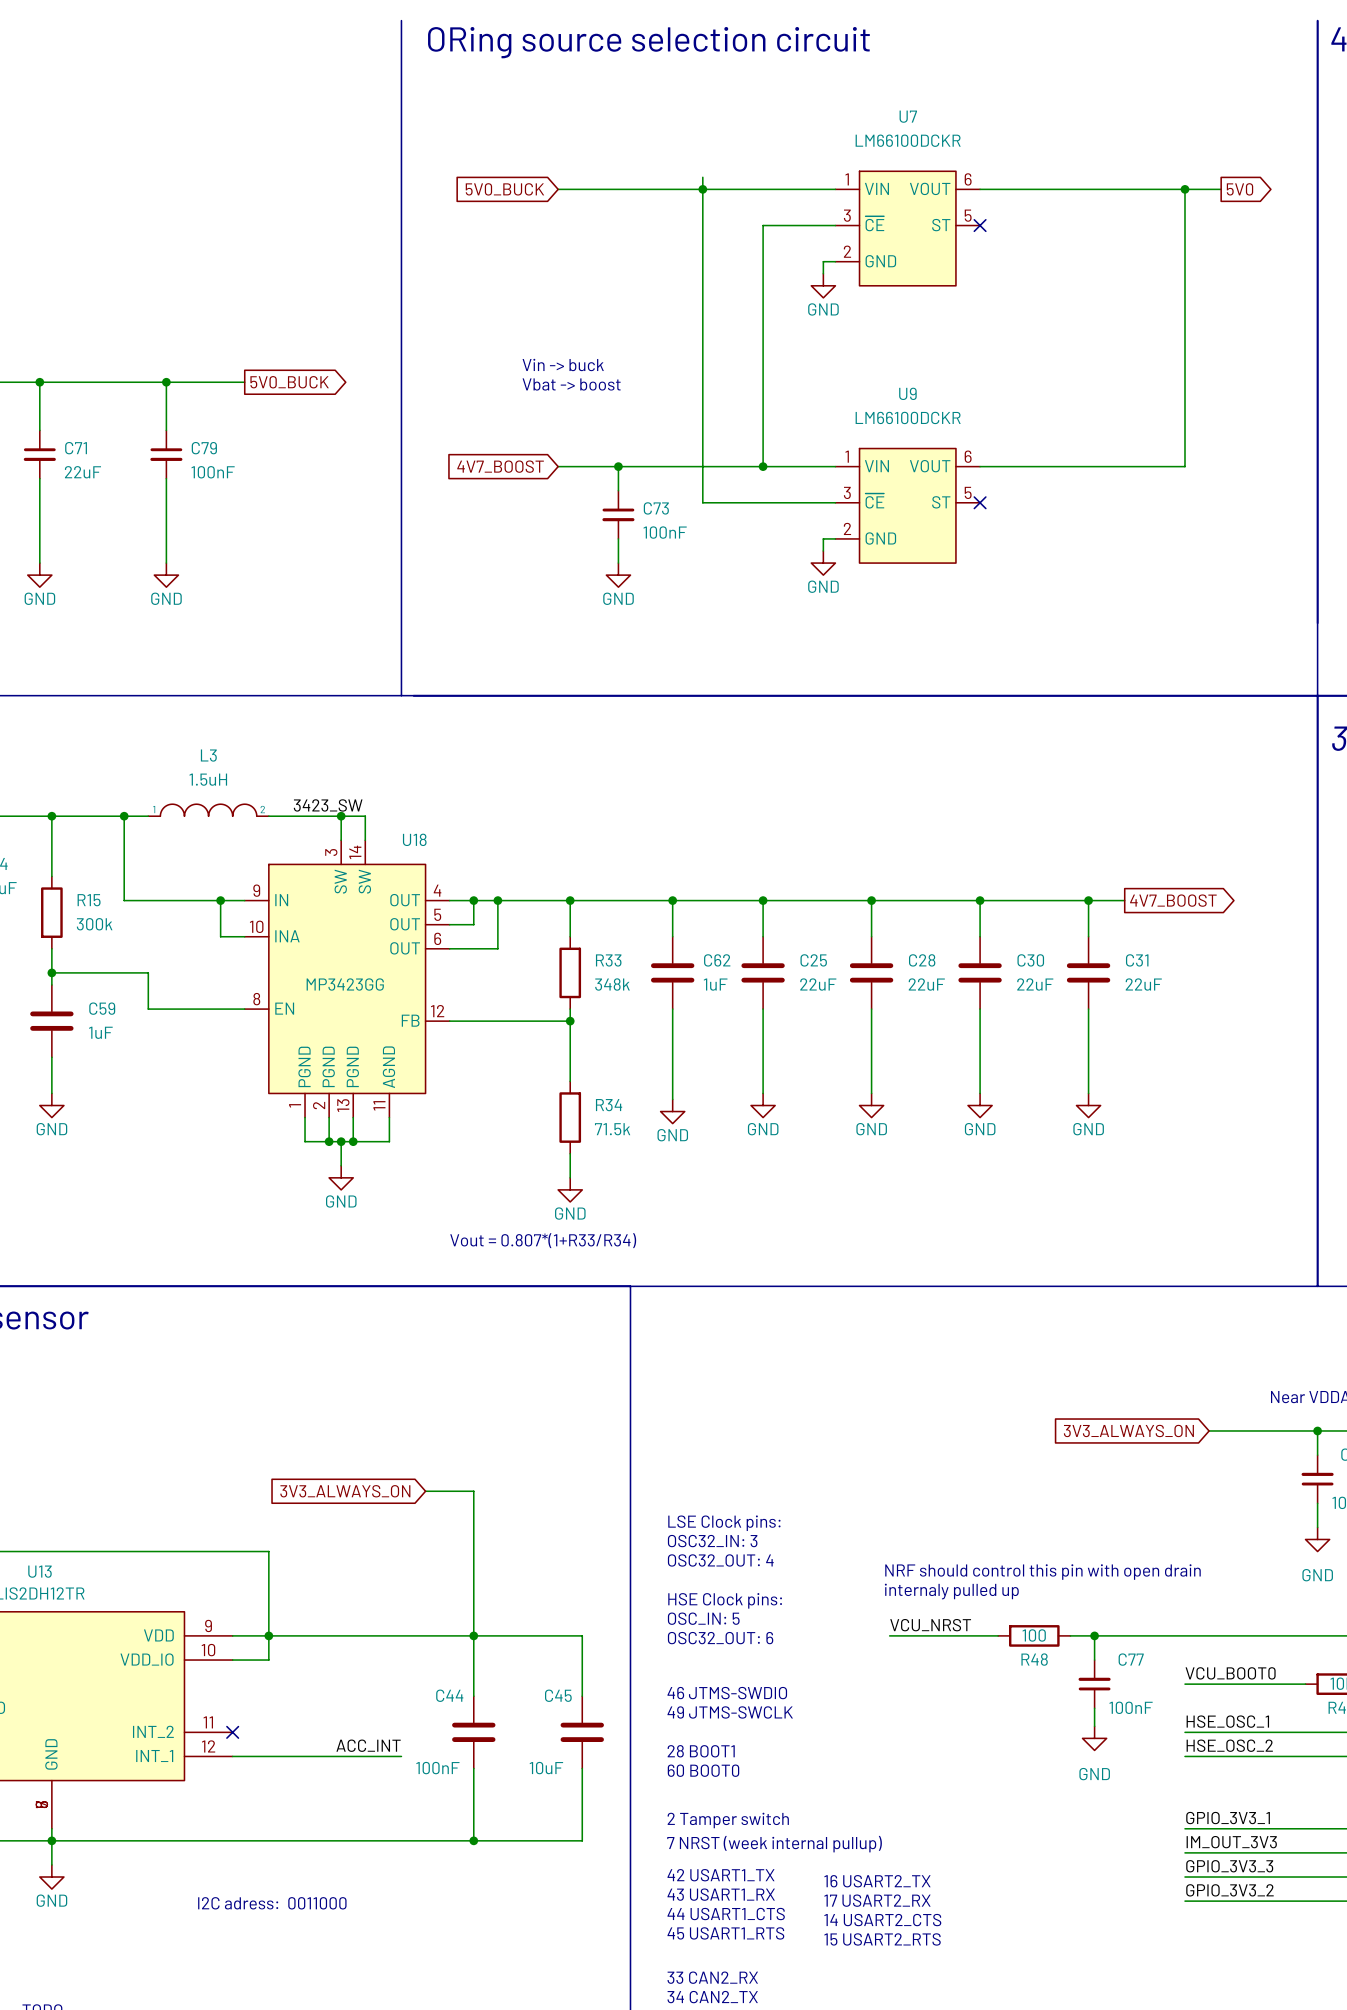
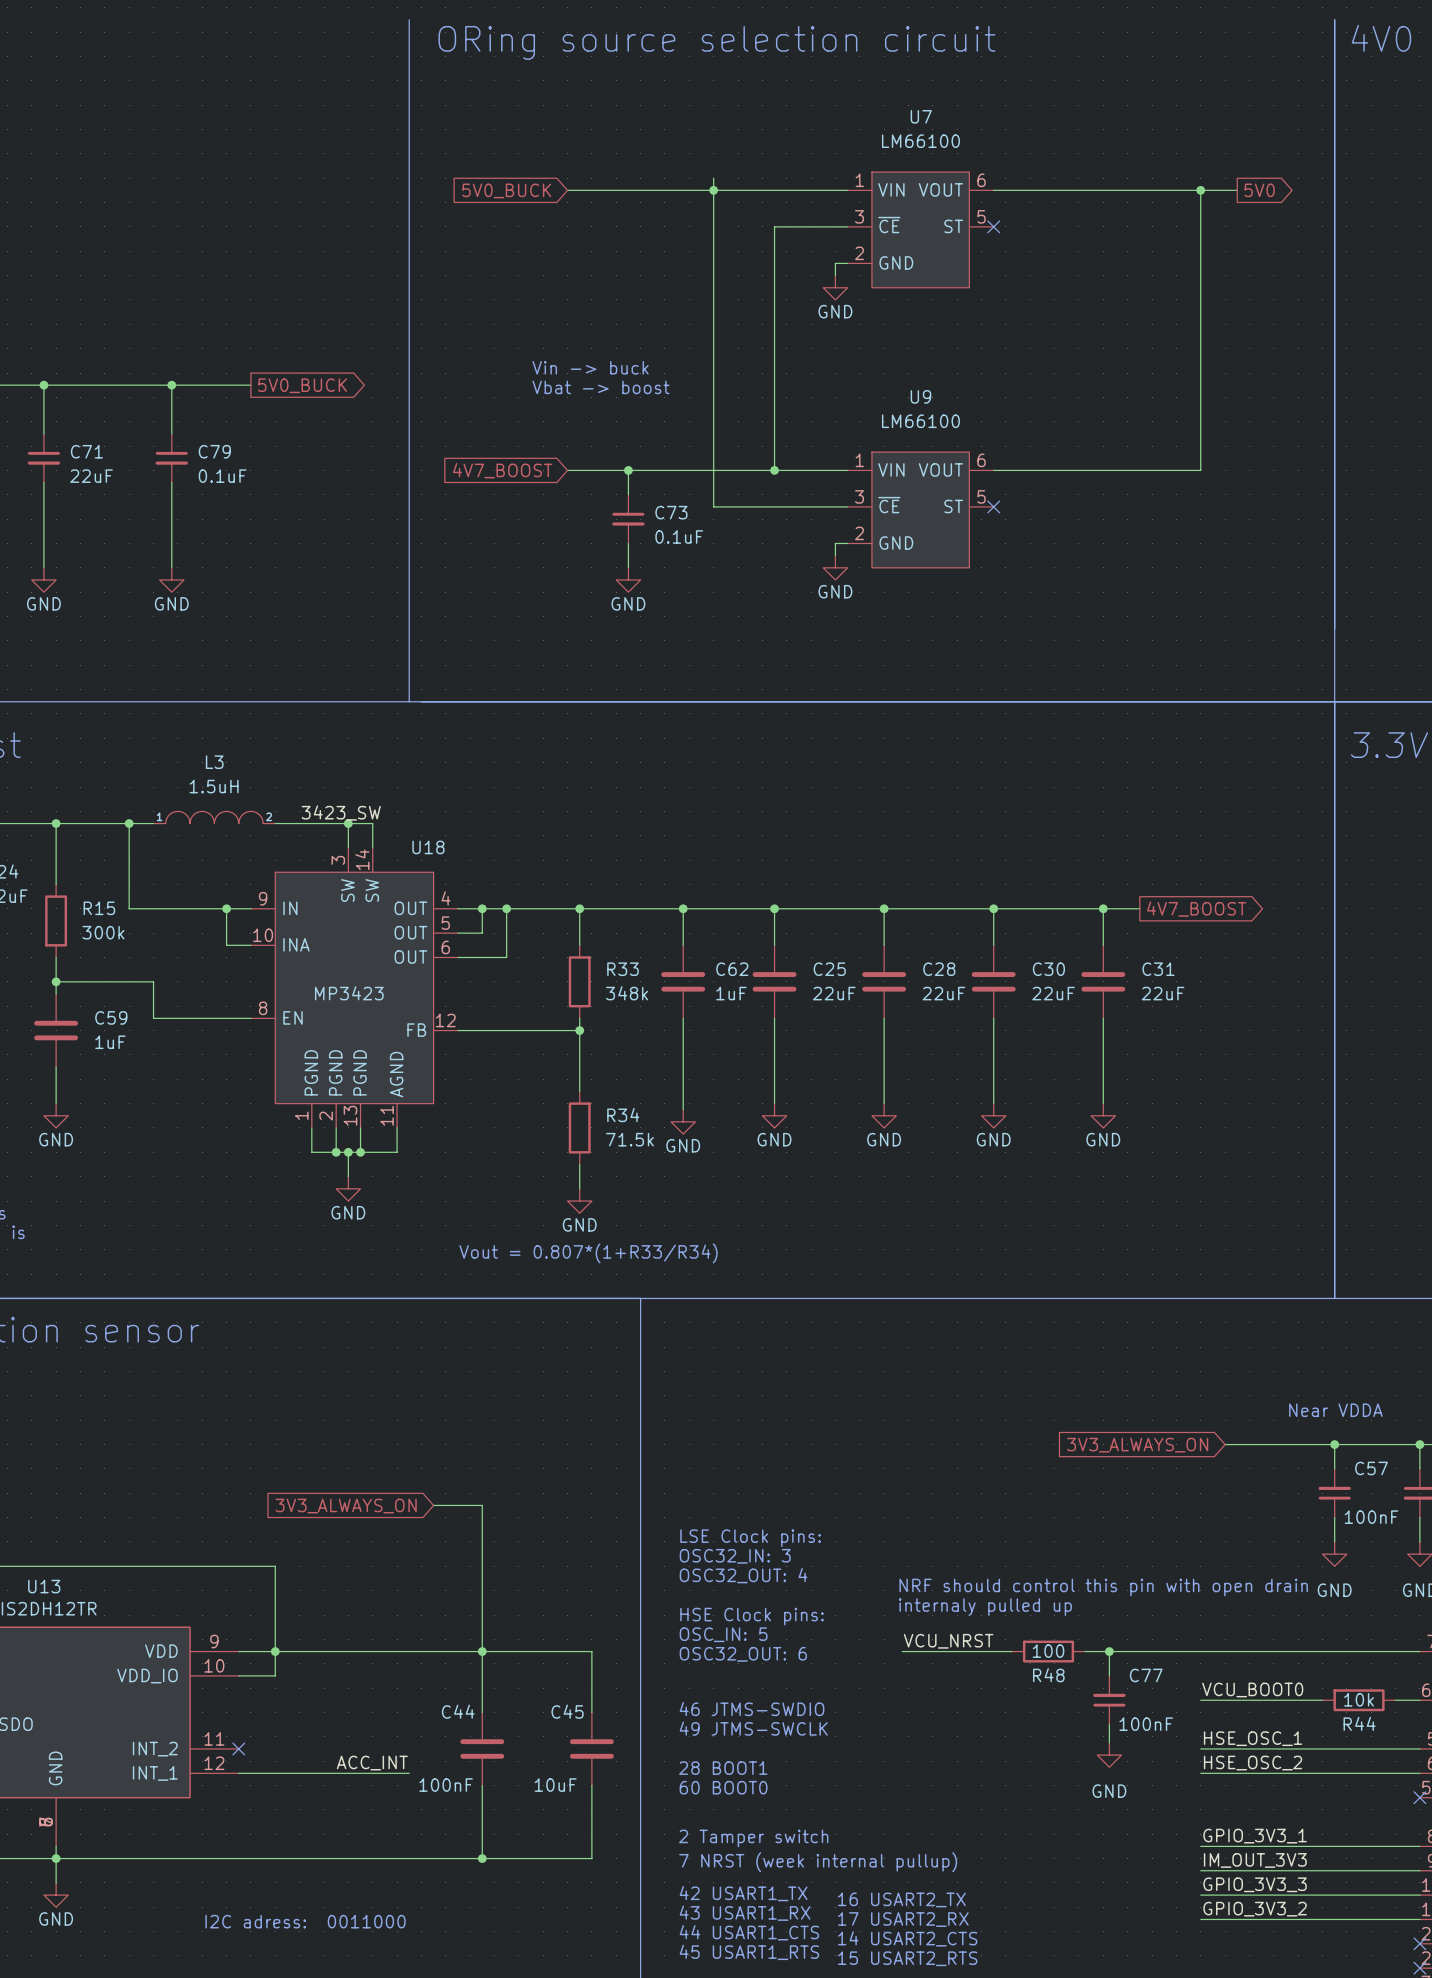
U7 value: LM66100DCKR (908, 140) -> LM66100 (920, 141)
U9 value: LM66100DCKR (908, 417) -> LM66100 (920, 421)
C79 value: 100nF (213, 472) -> 0.1uF (222, 476)
C73 value: 100nF (665, 532) -> 0.1uF (679, 536)
U18 value: MP3423GG (345, 984) -> MP3423 (349, 993)

